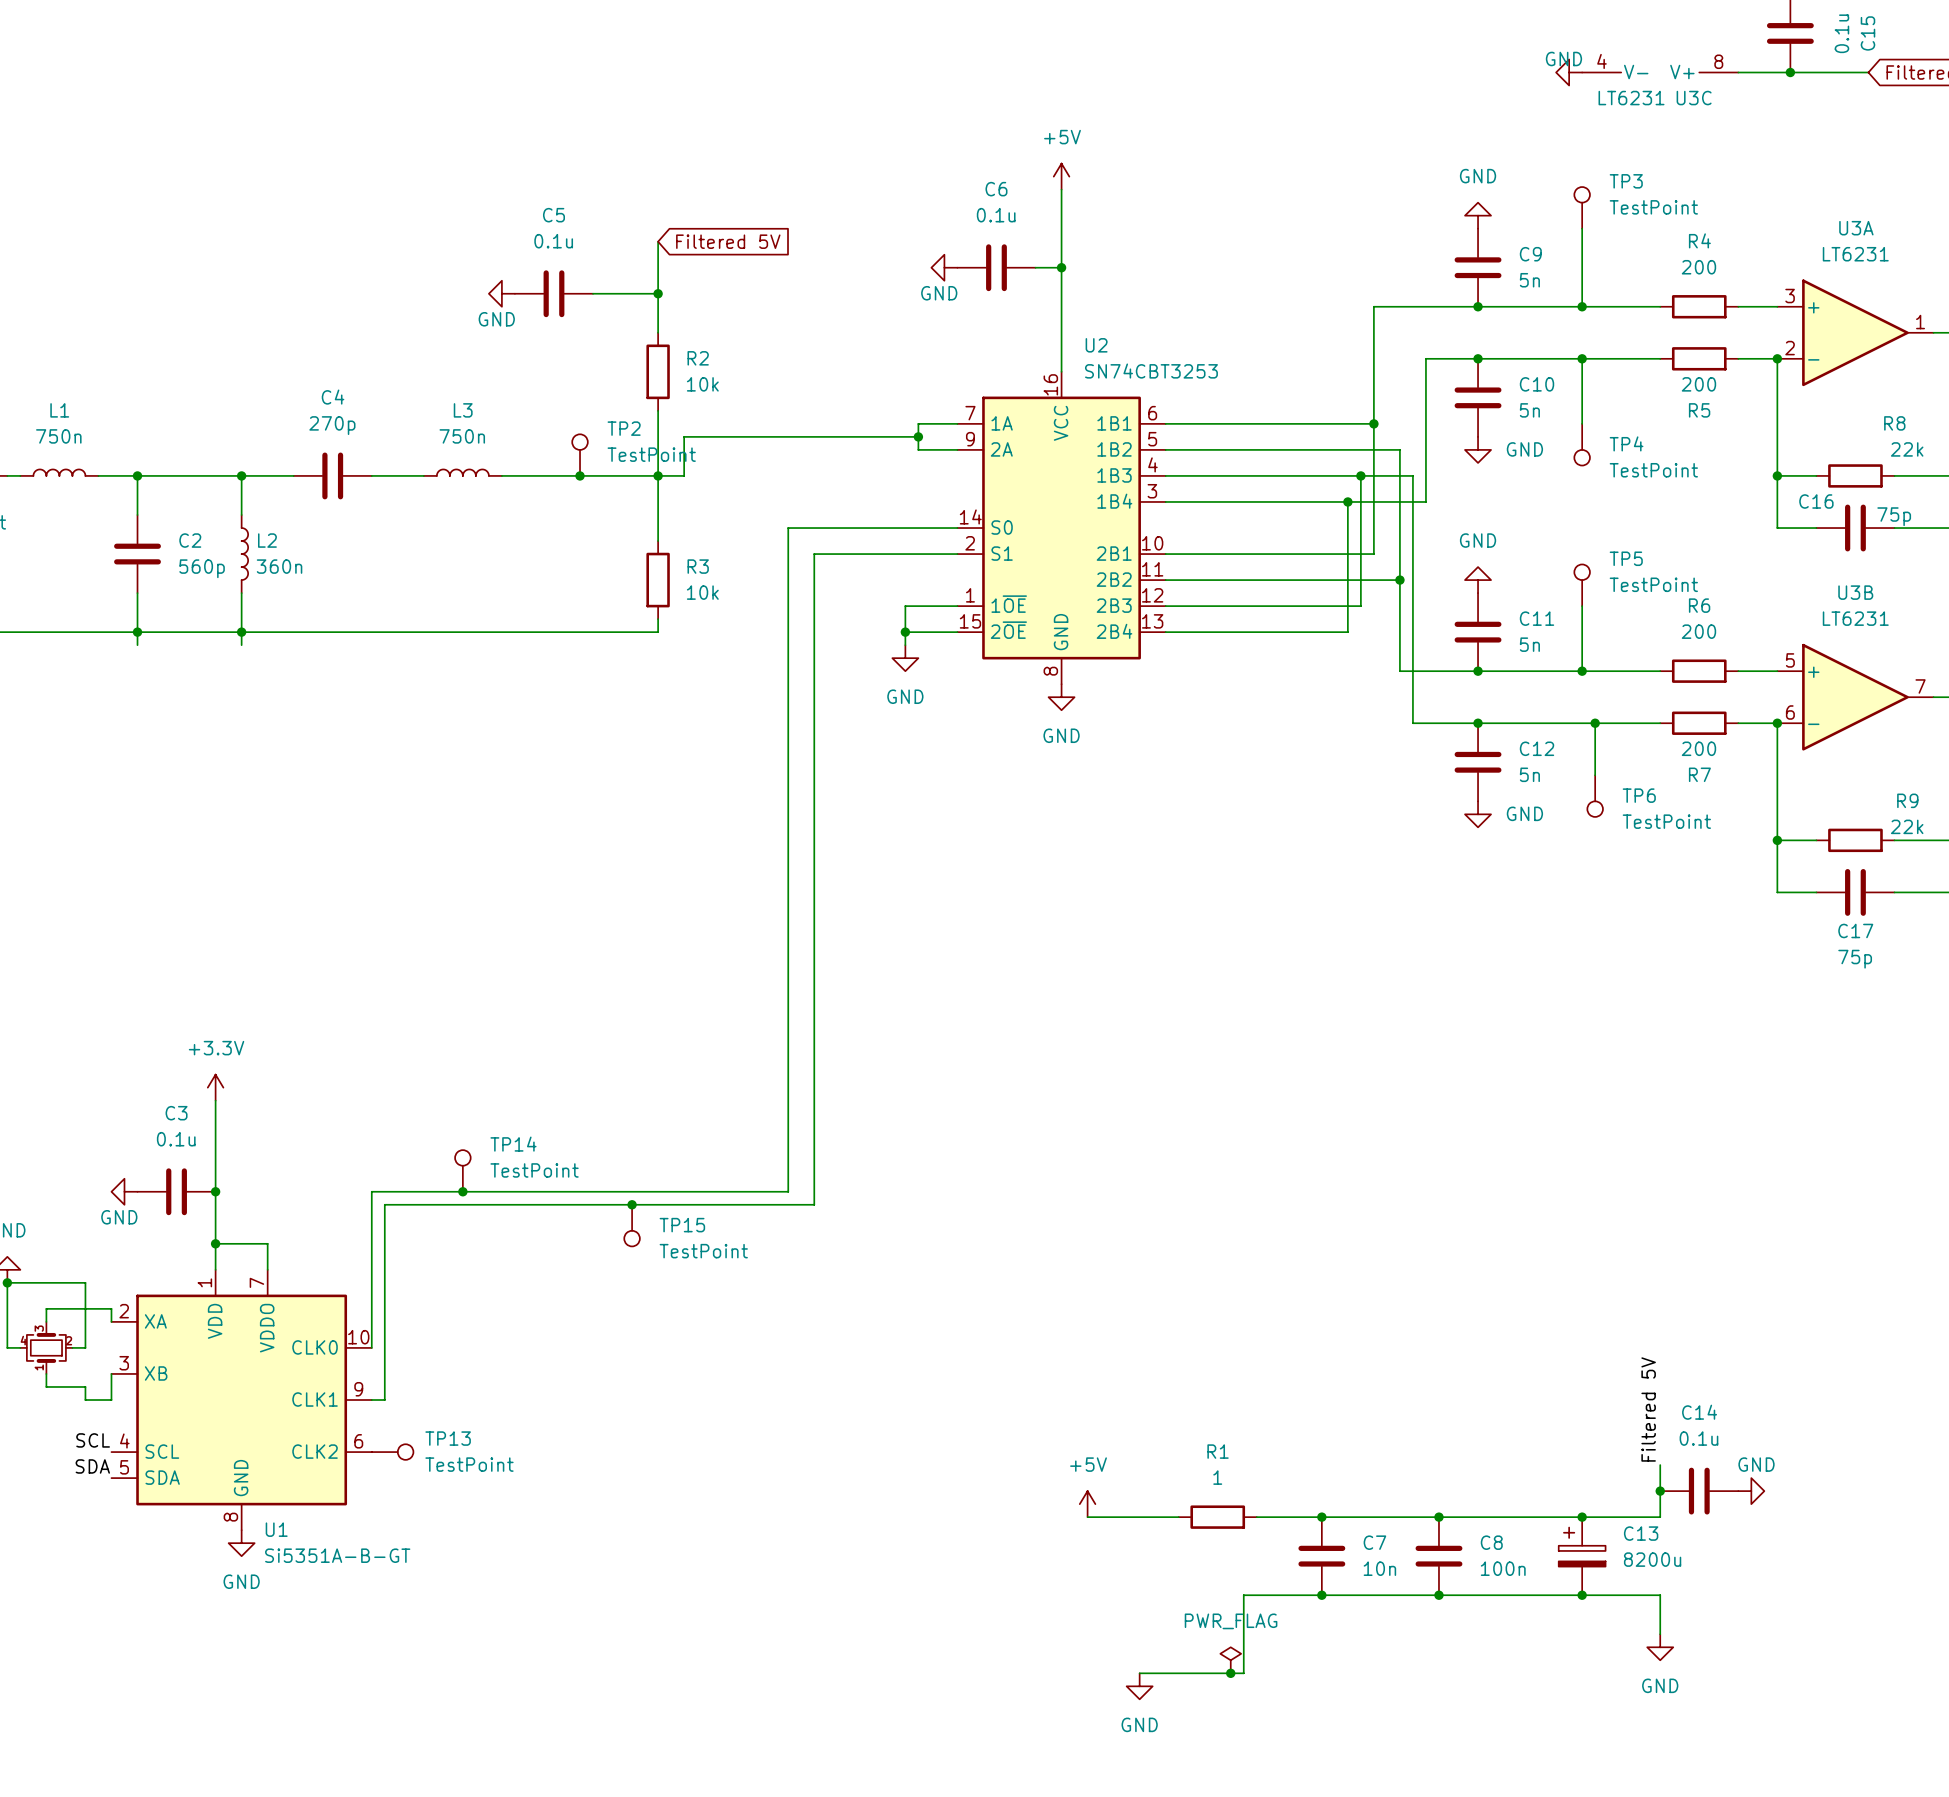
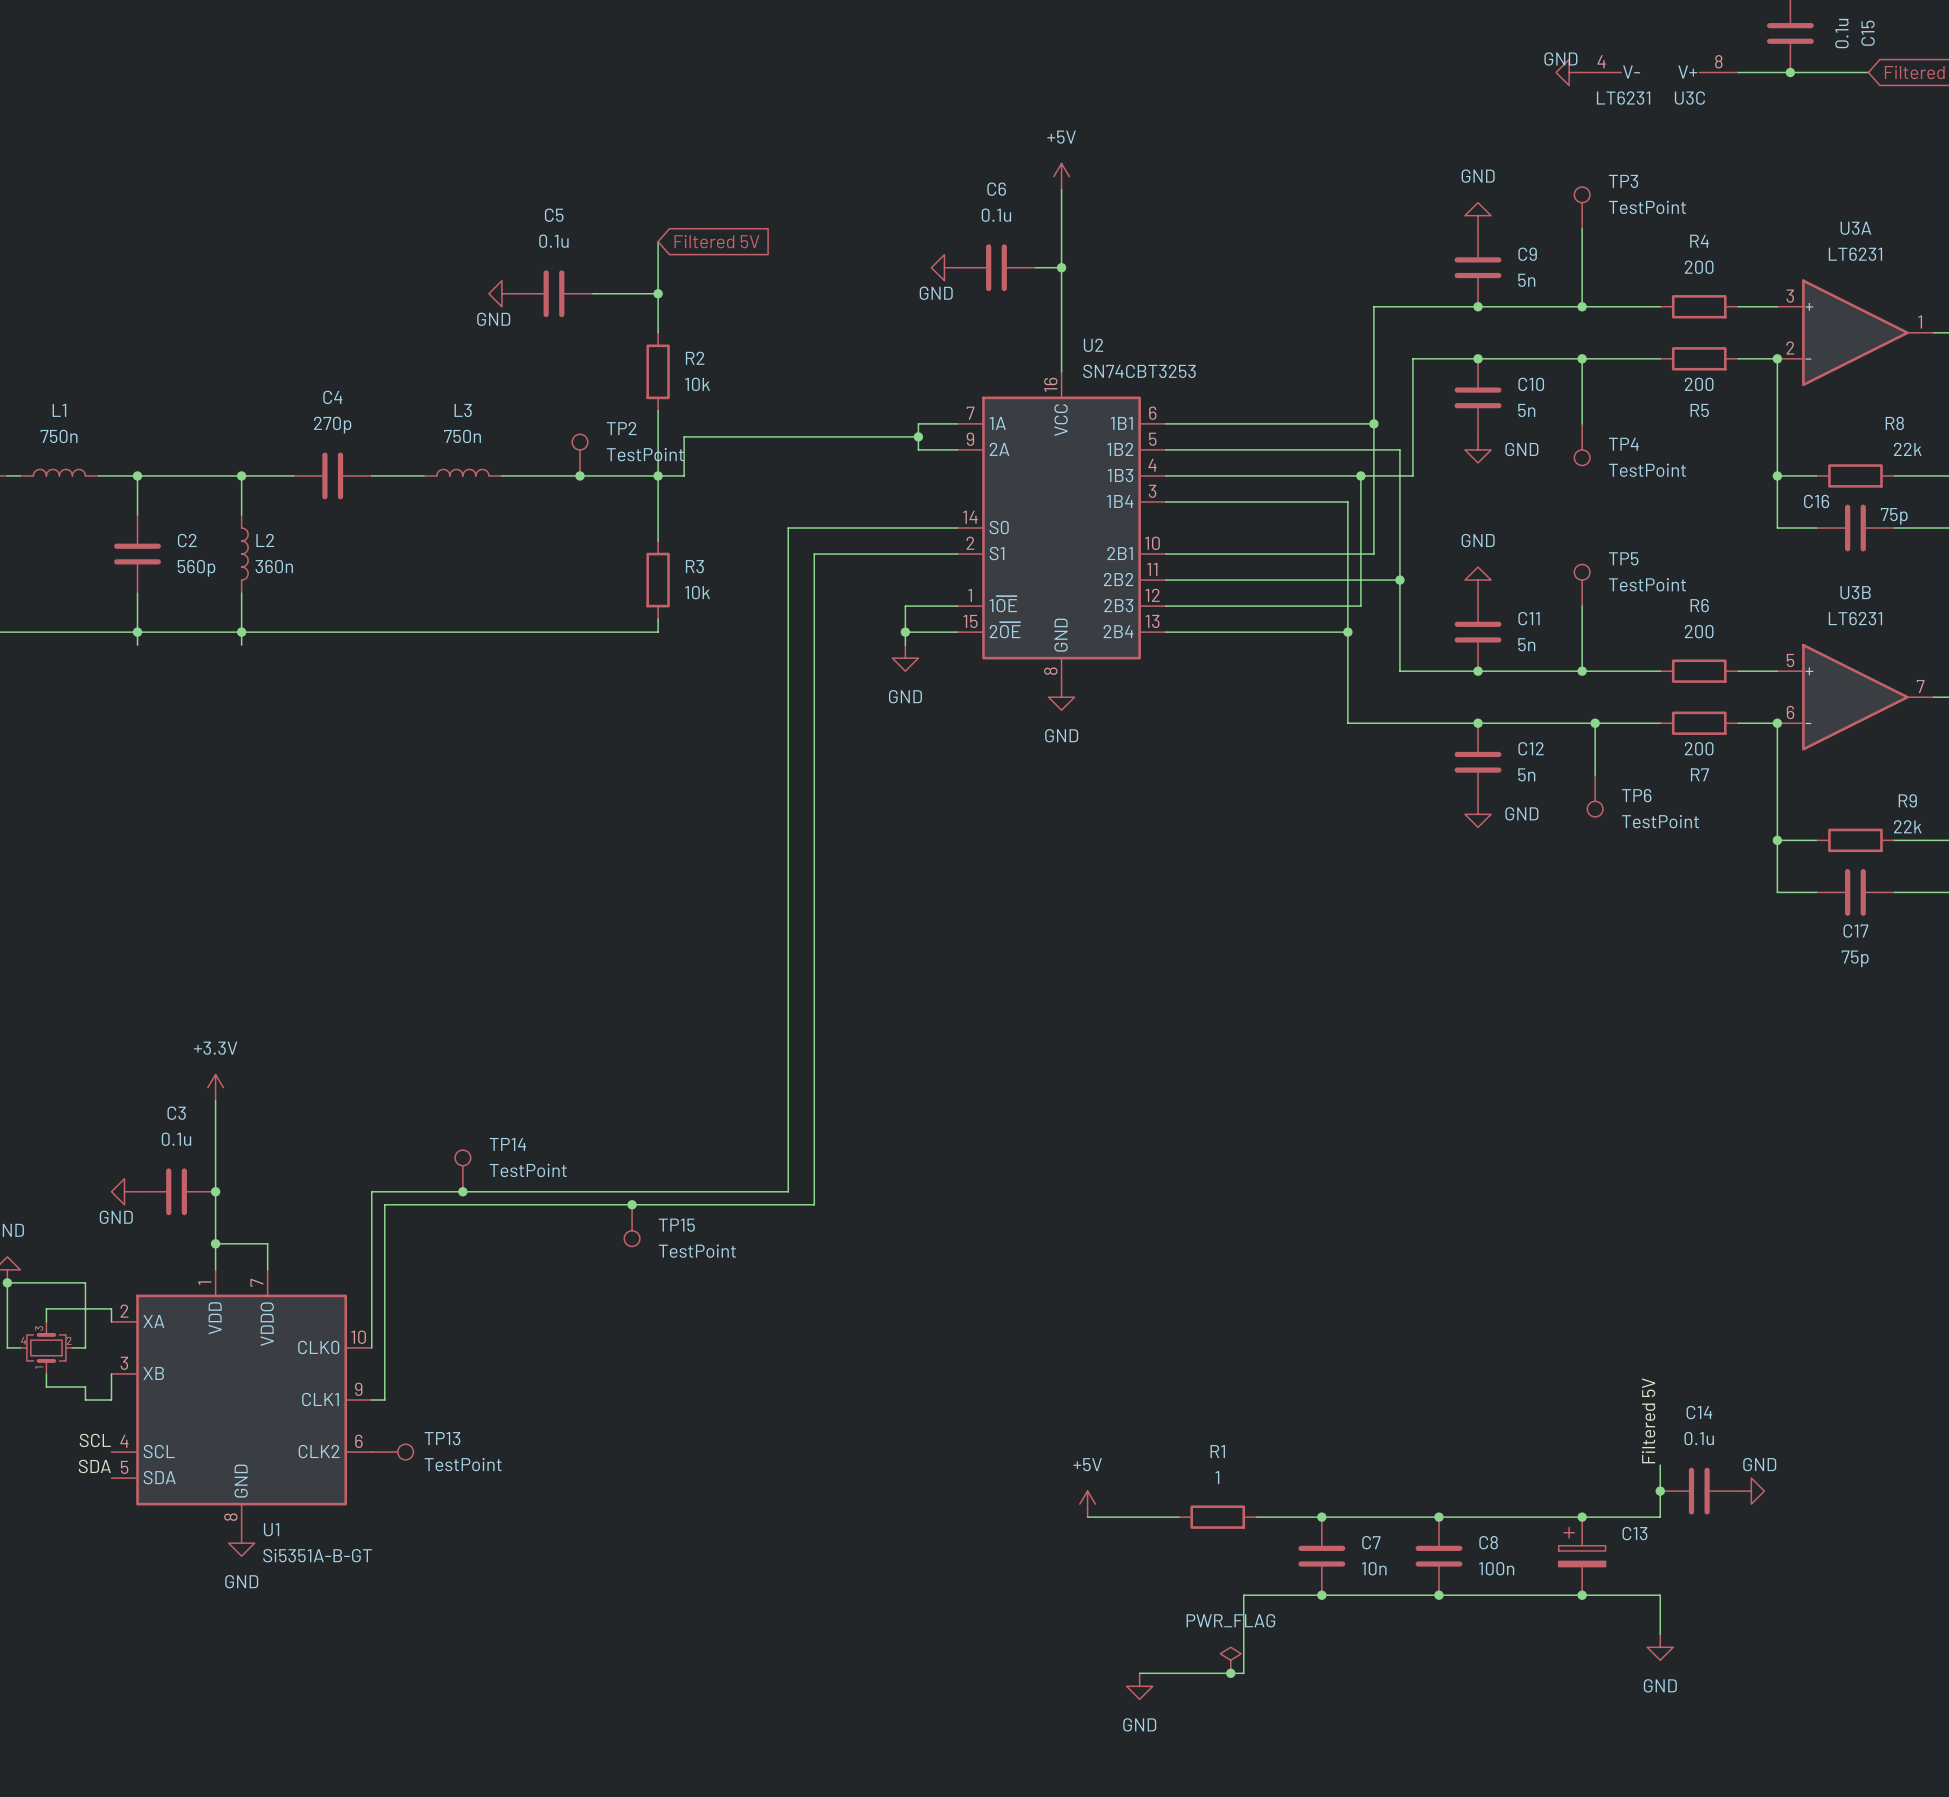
wire: (1425, 358) (1425, 501) (1347, 501) -> (1425, 358) (1412, 358) (1412, 475)
wire: (1412, 475) (1412, 723) -> (1347, 632) (1347, 723) (1412, 723)
junction: (1347, 501) -> none
junction: none -> (1347, 632)
C13 value: 8200u (1652, 1559) -> none

